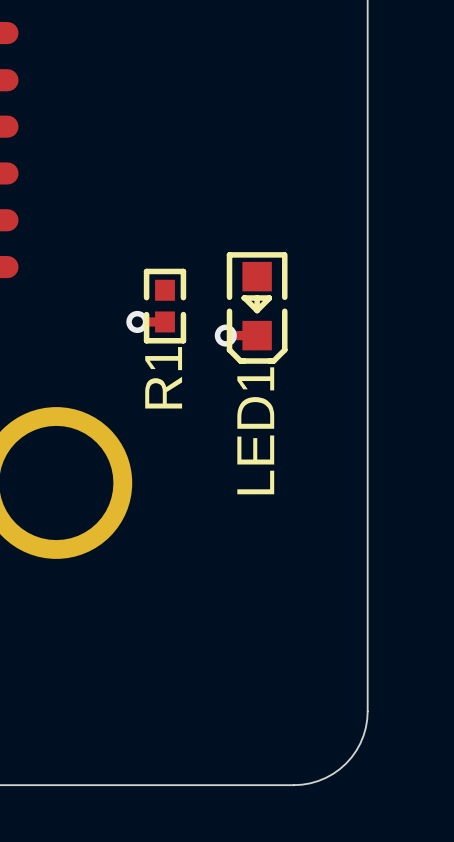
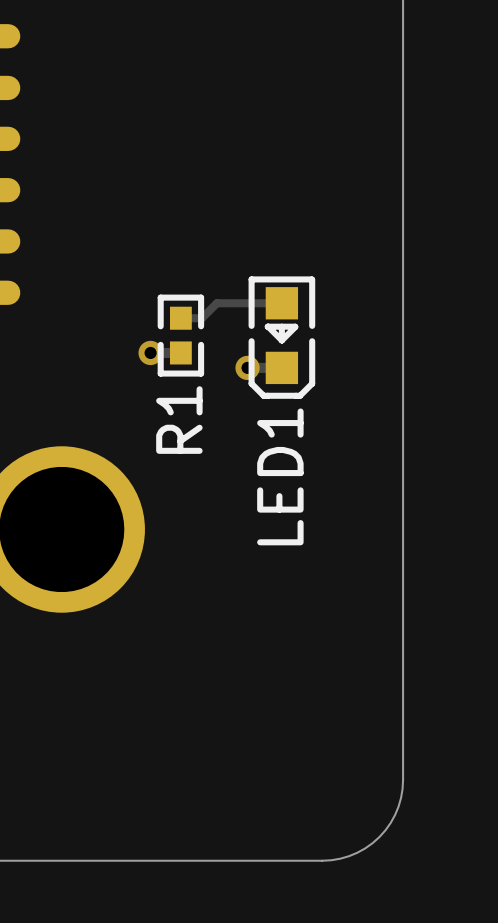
track: none -> (281, 303) (216, 303) (201, 318) (180, 318)

